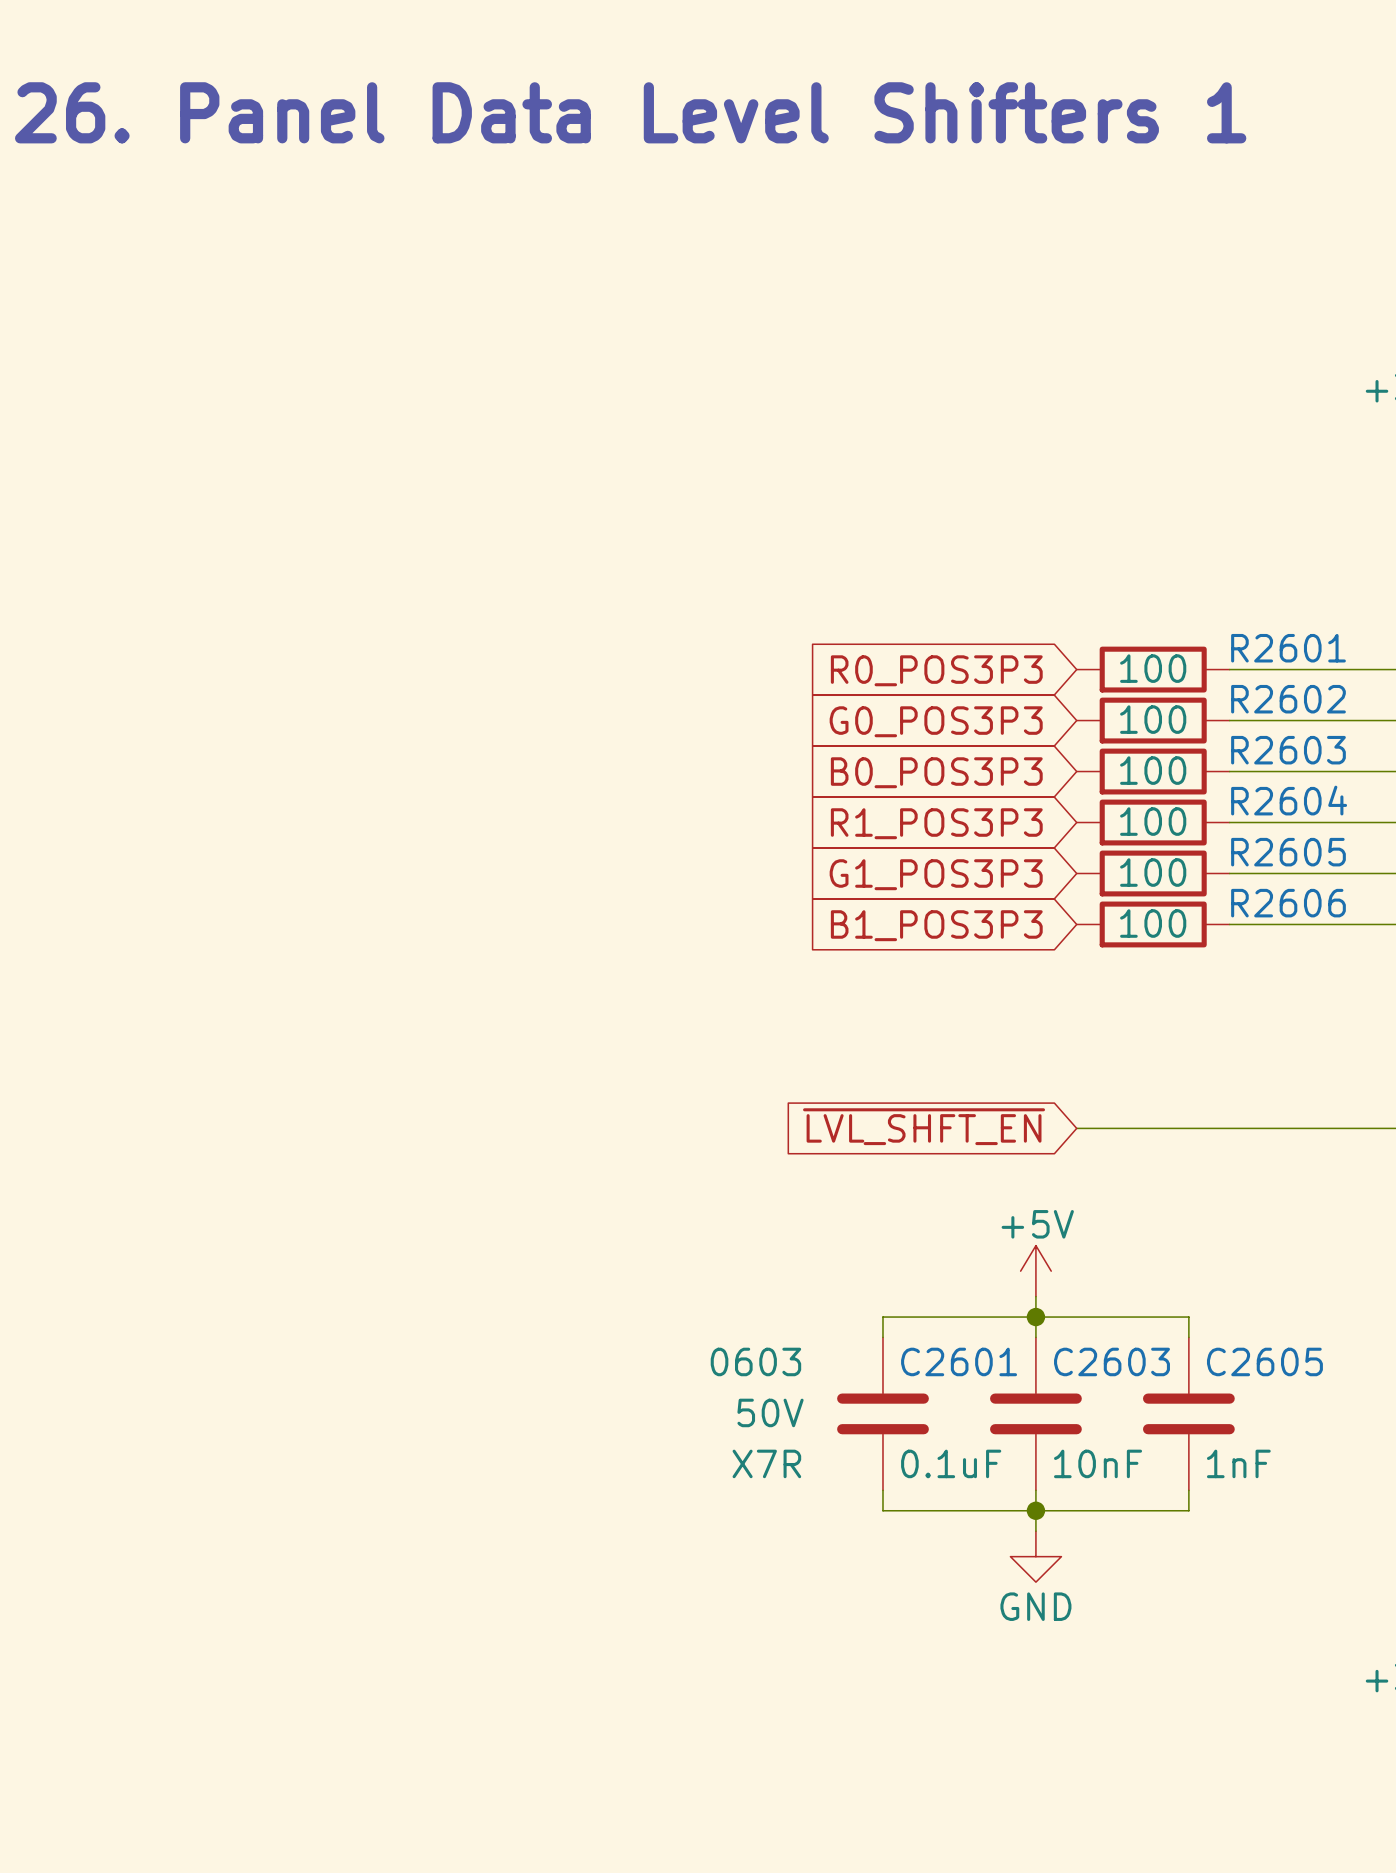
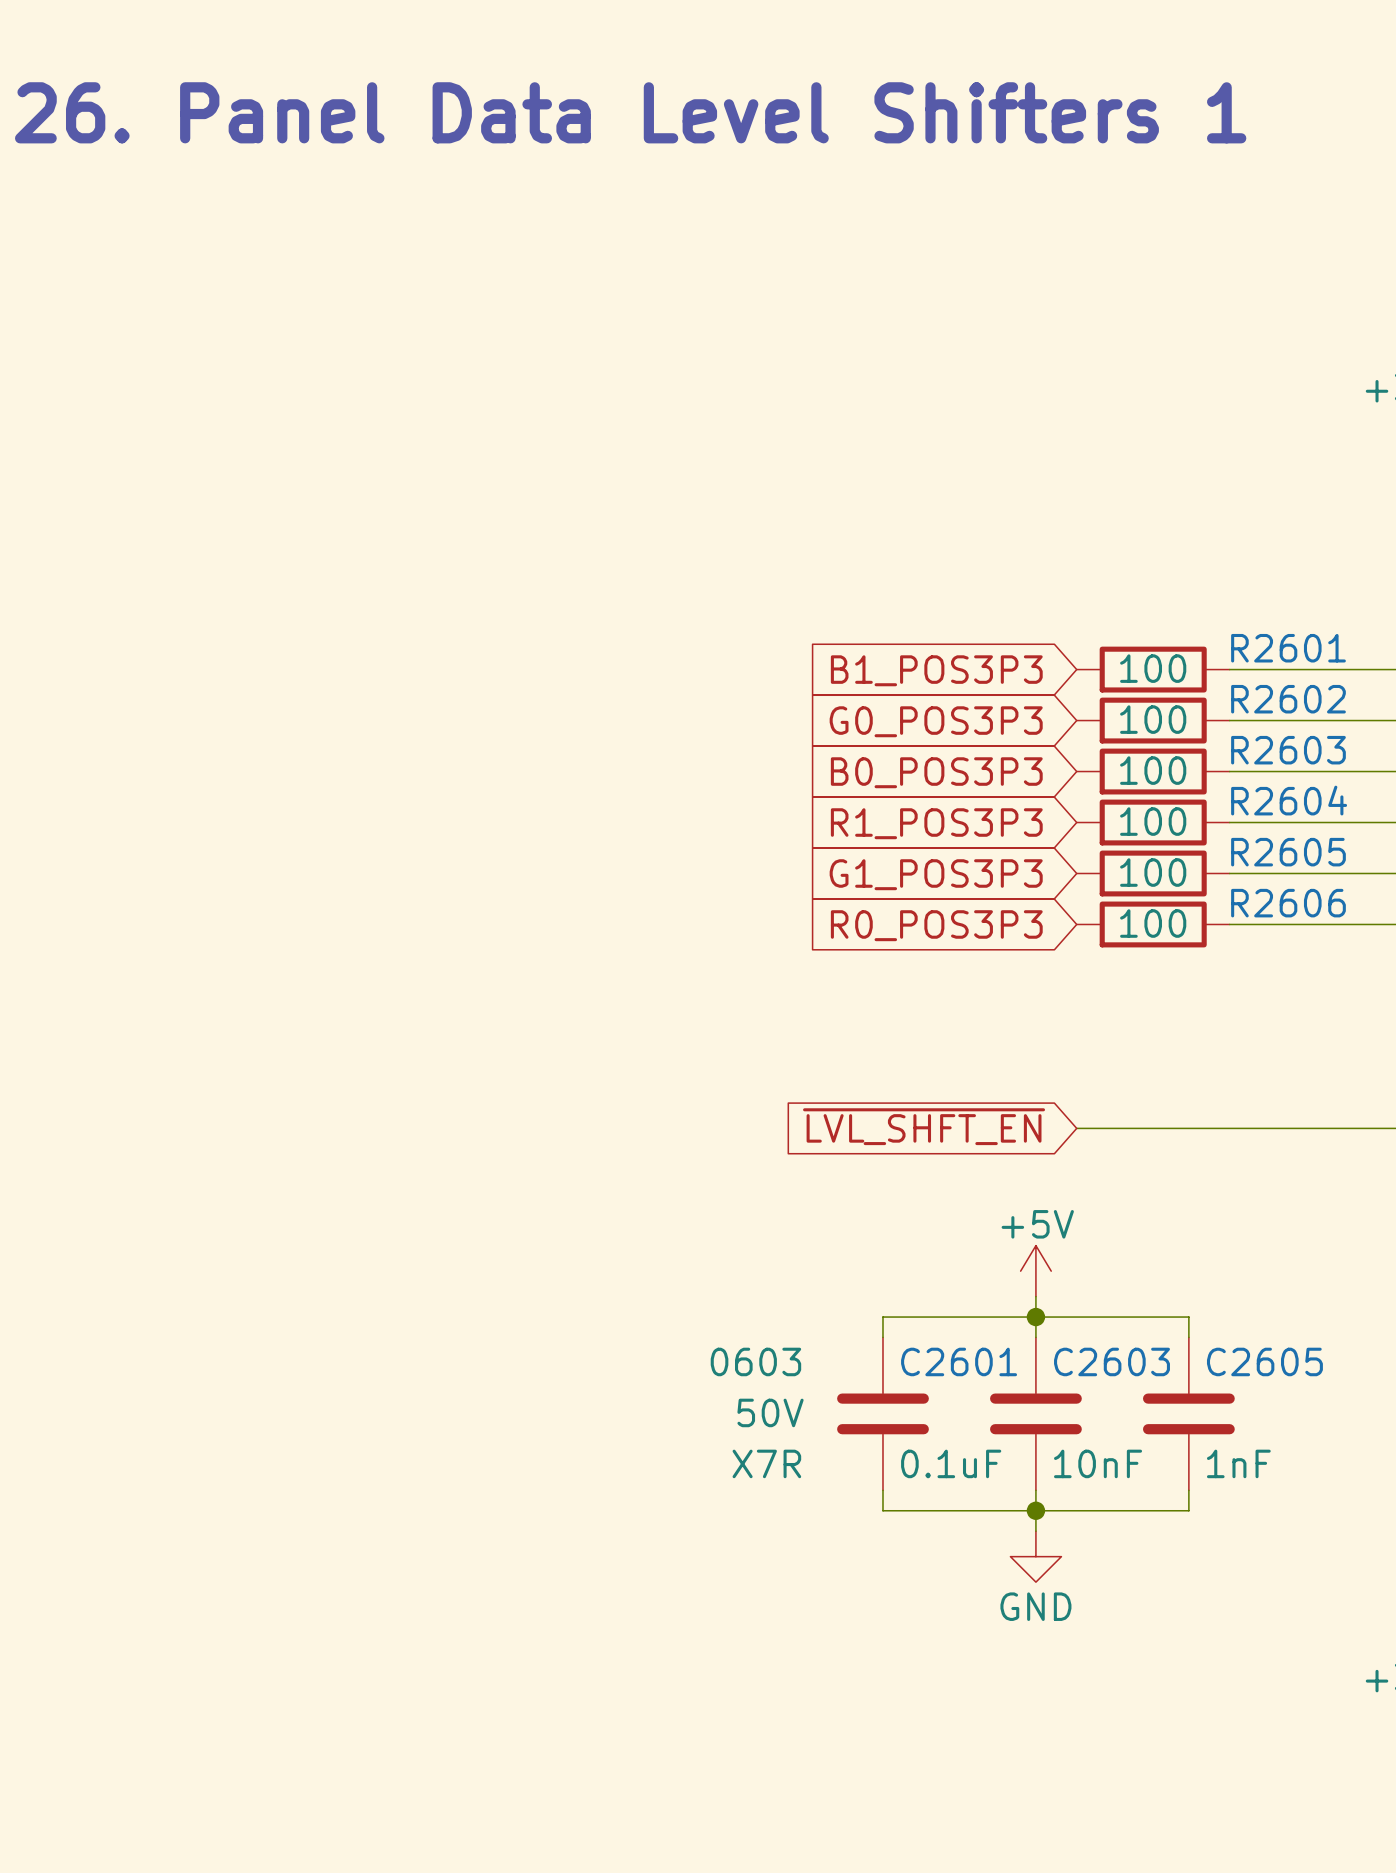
global label: R0_POS3P3 (936, 670) -> B1_POS3P3 (936, 670)
global label: B1_POS3P3 (936, 925) -> R0_POS3P3 (936, 925)

